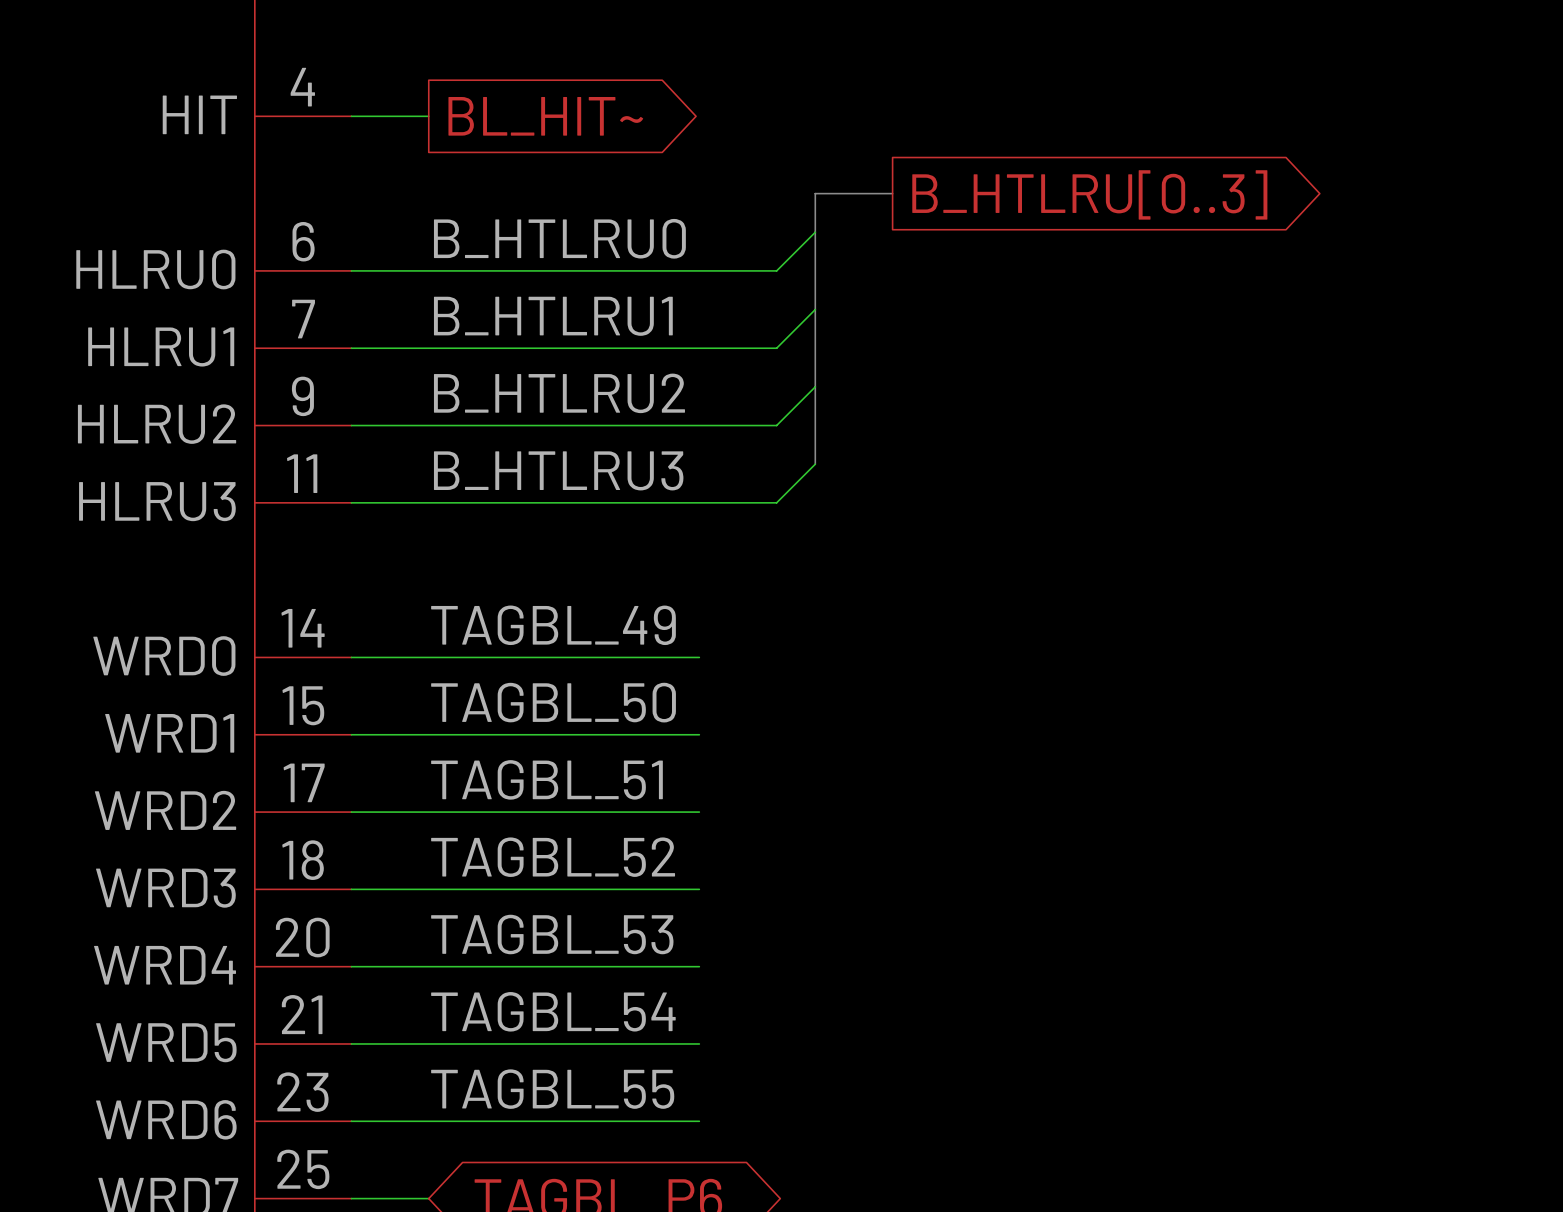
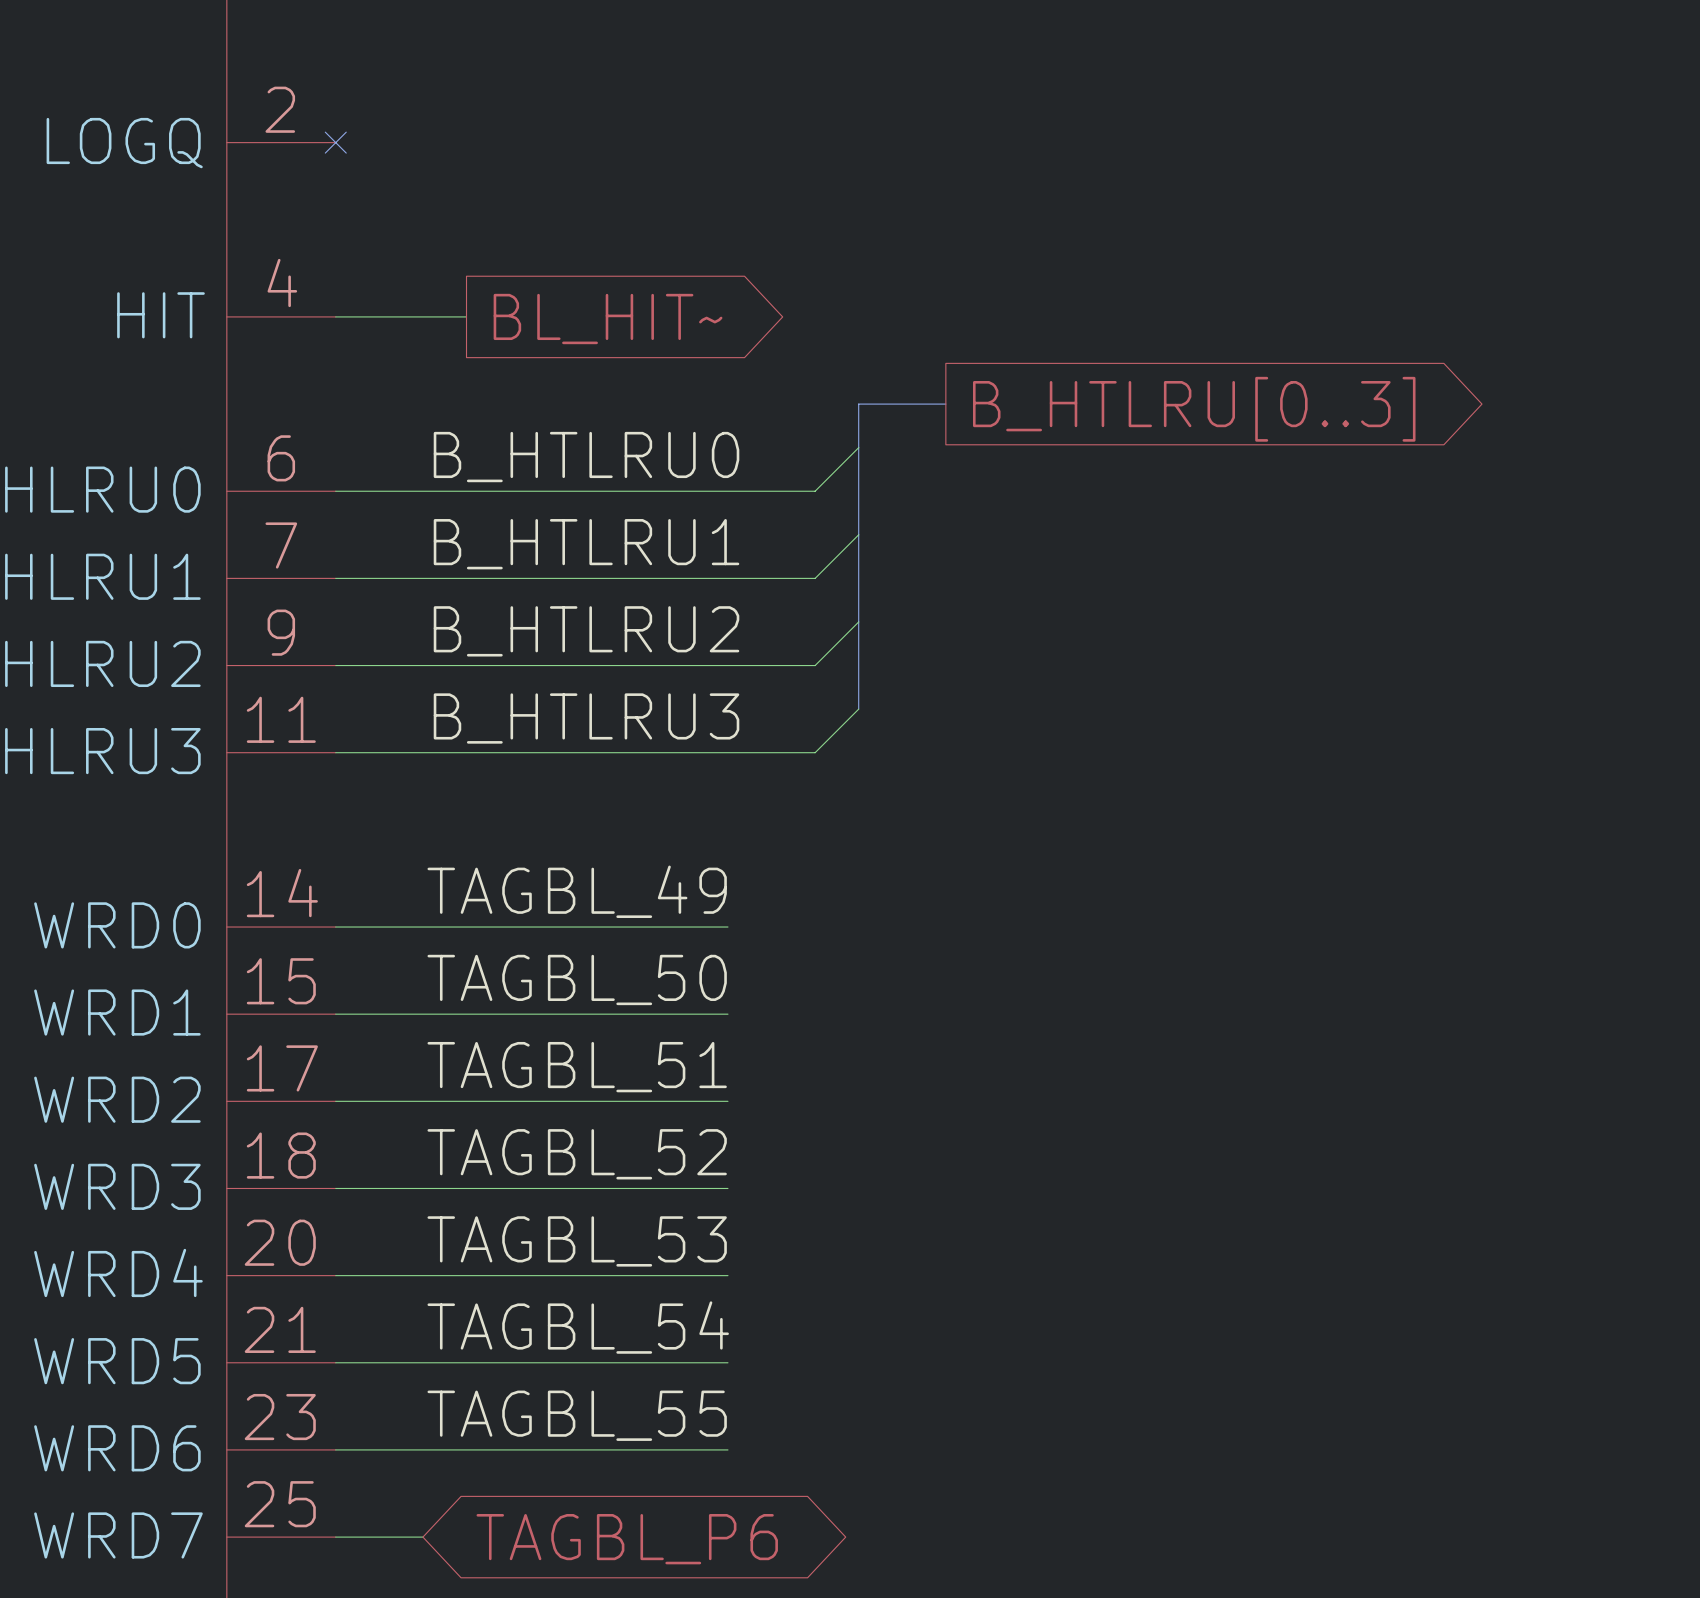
wire: none -> (422, 316) (466, 316)
global label position: BL_HIT~ (545, 116) -> BL_HIT~ (608, 319)

